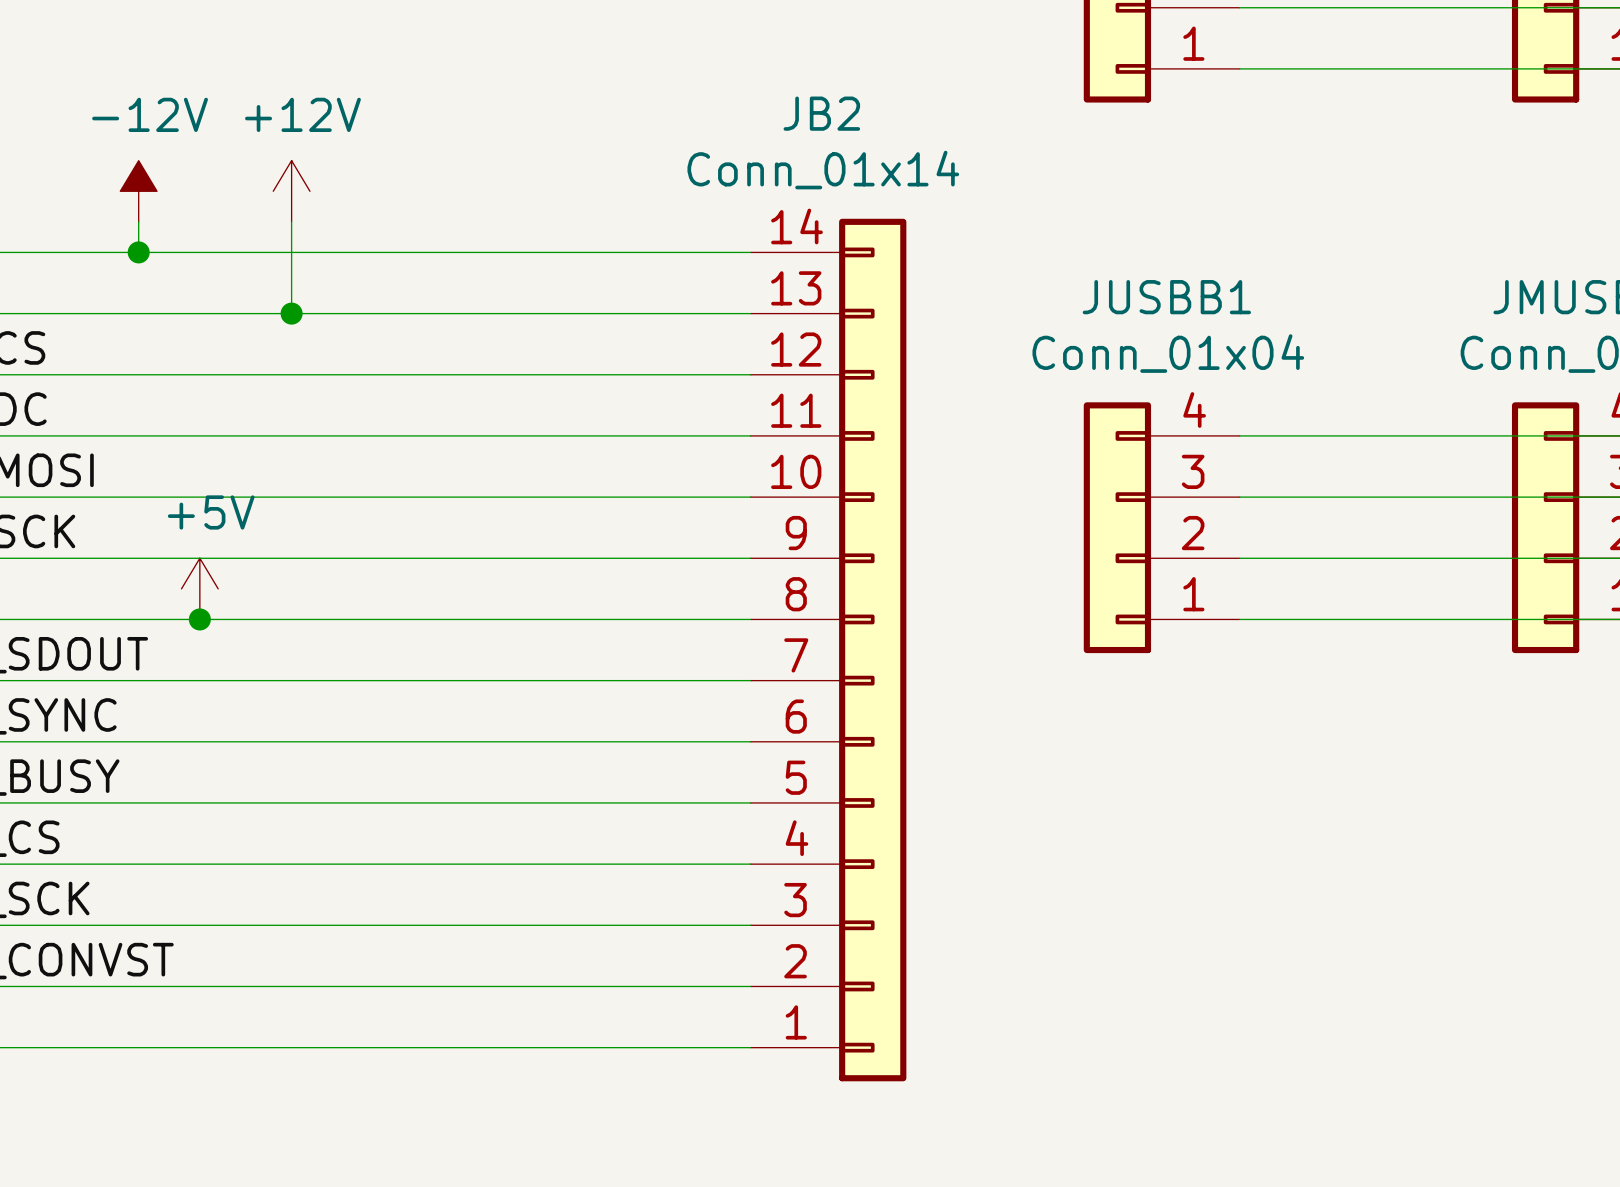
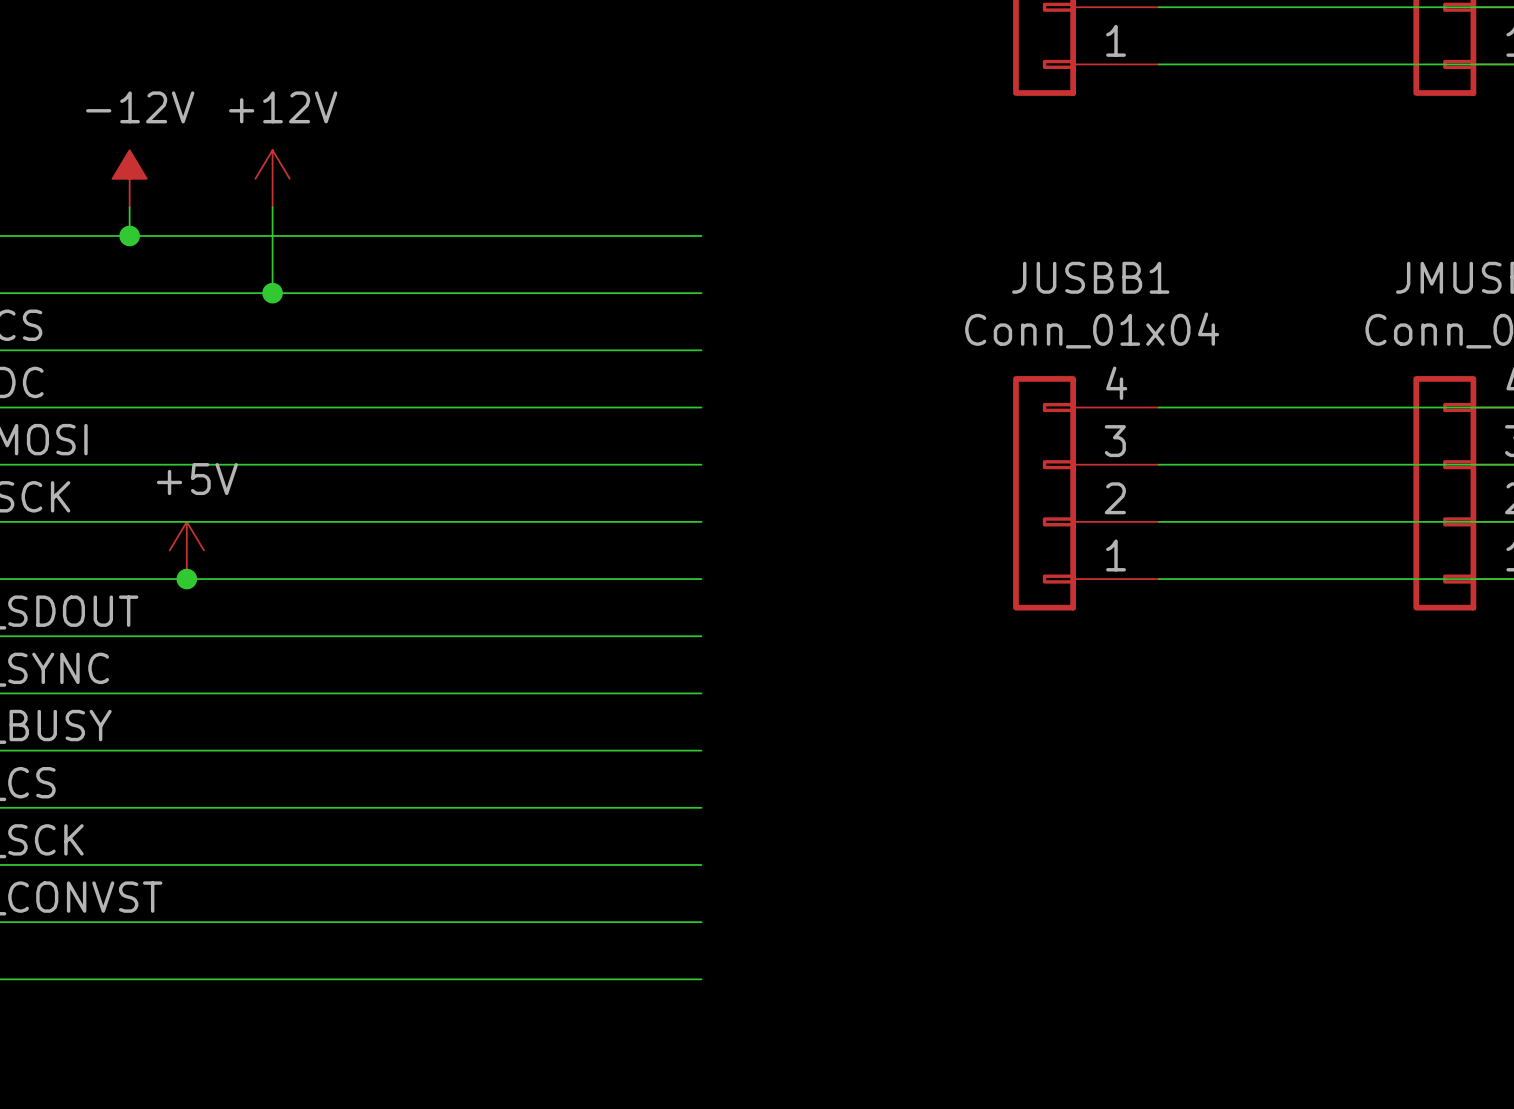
JB2: Conn_01x14 (828, 650) -> none

